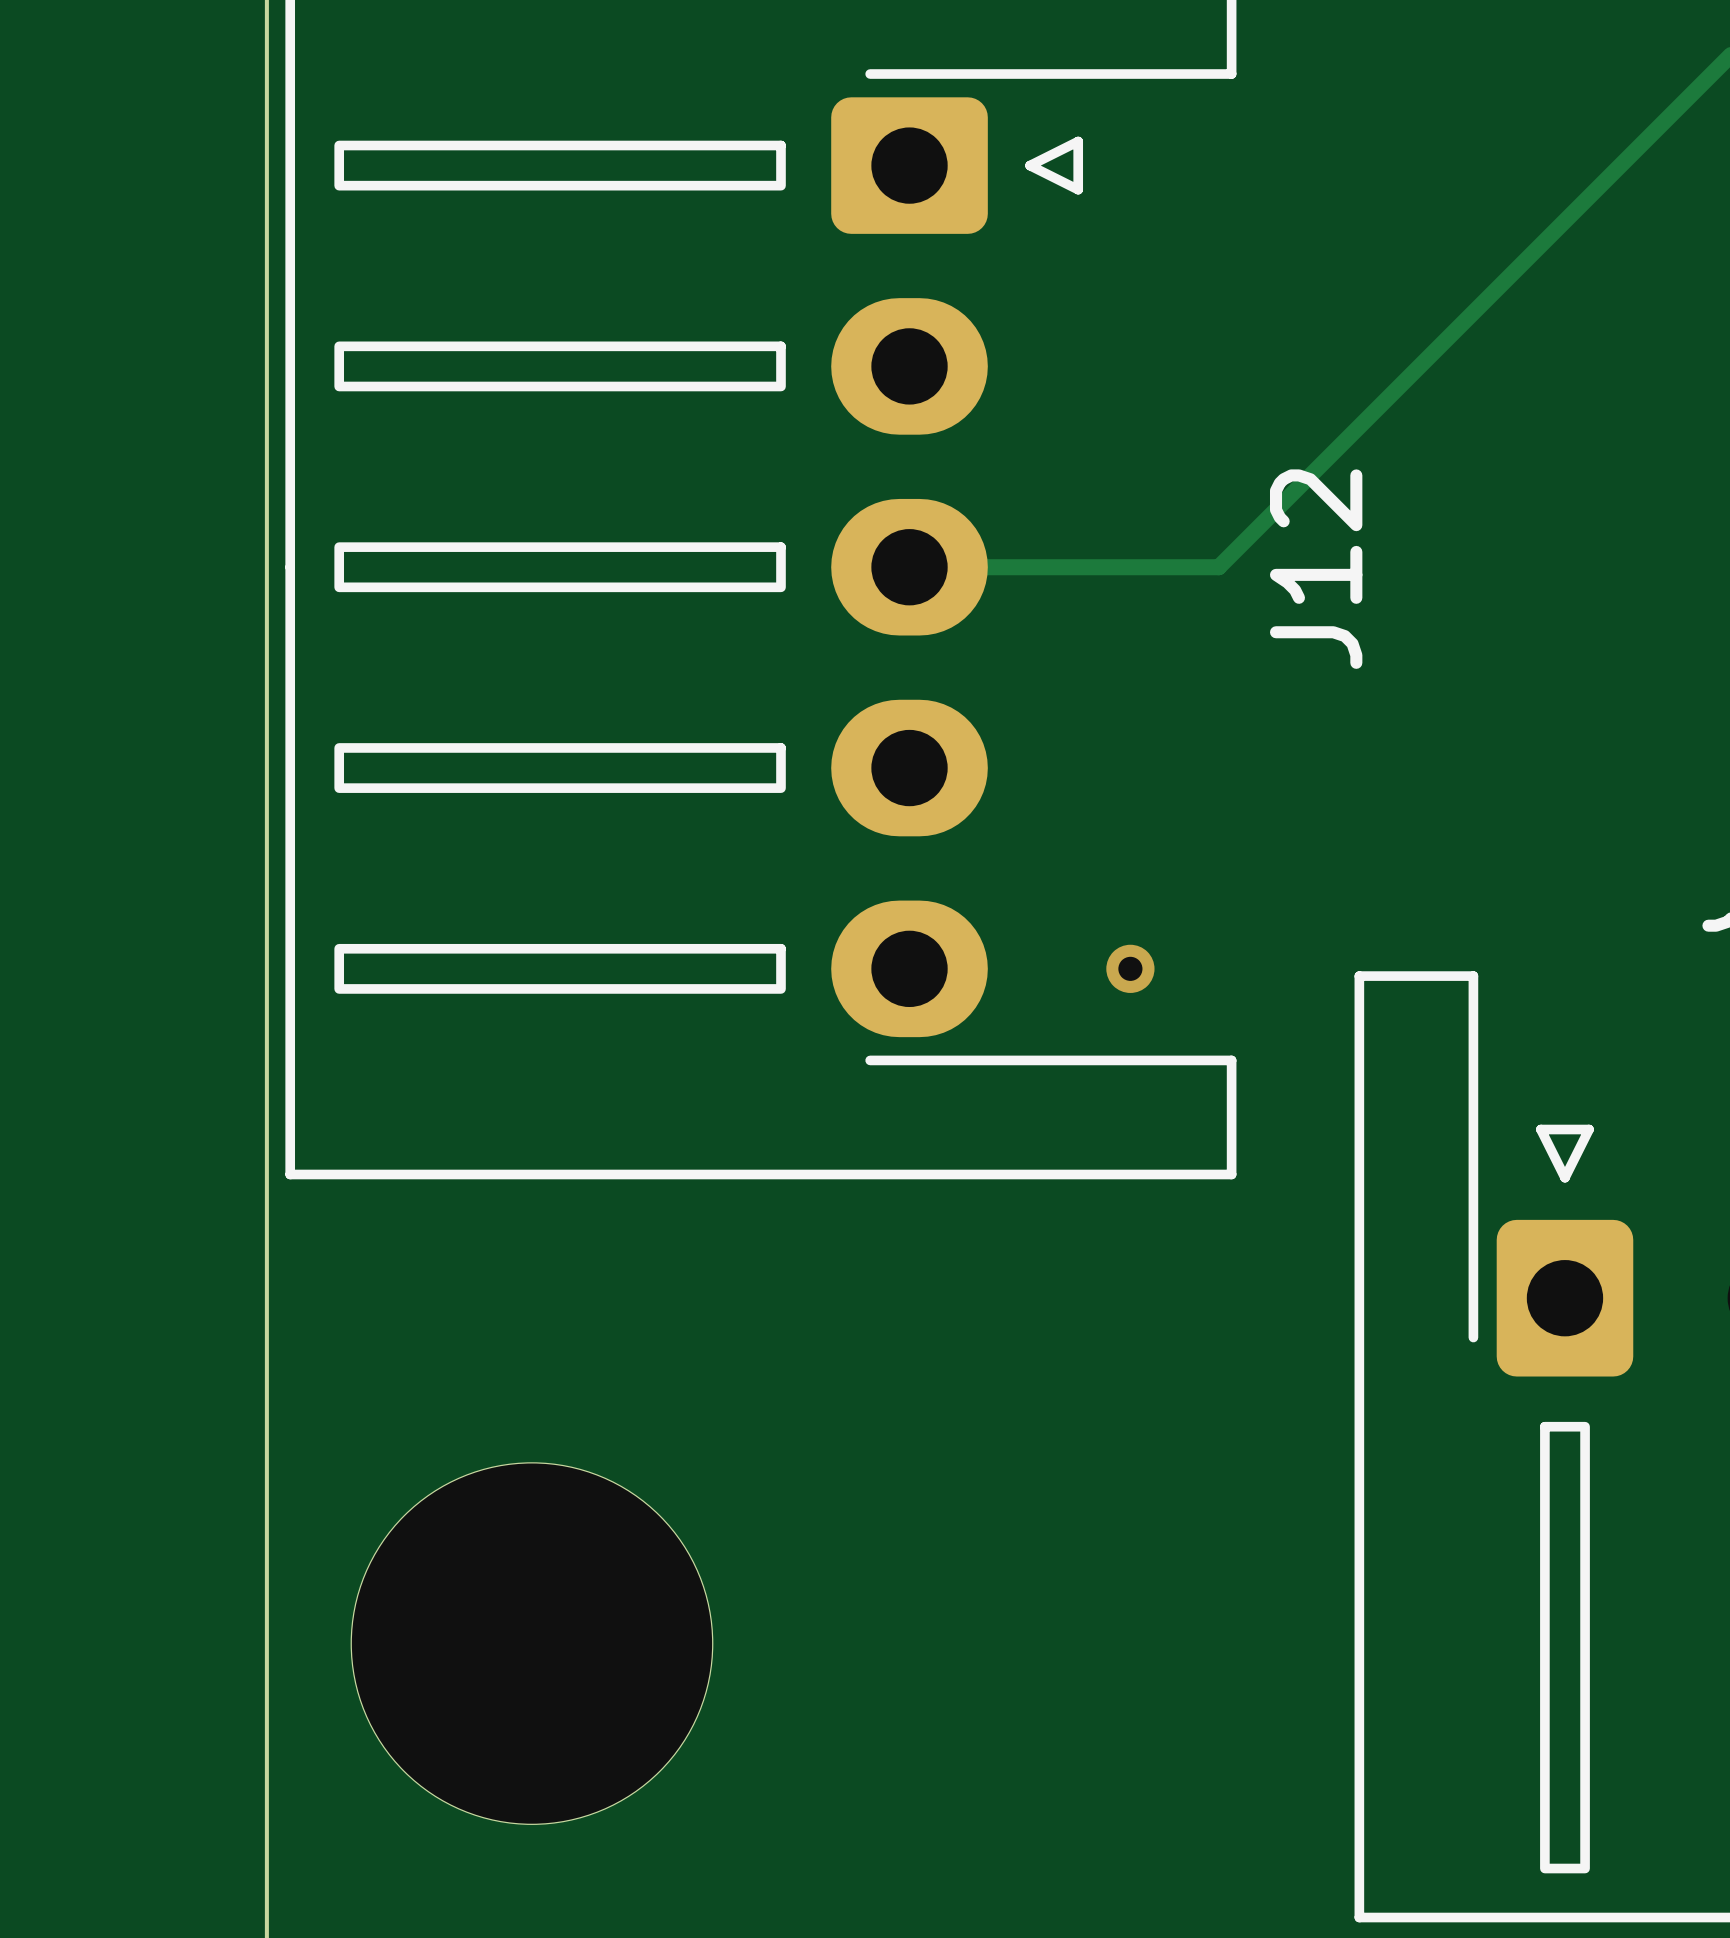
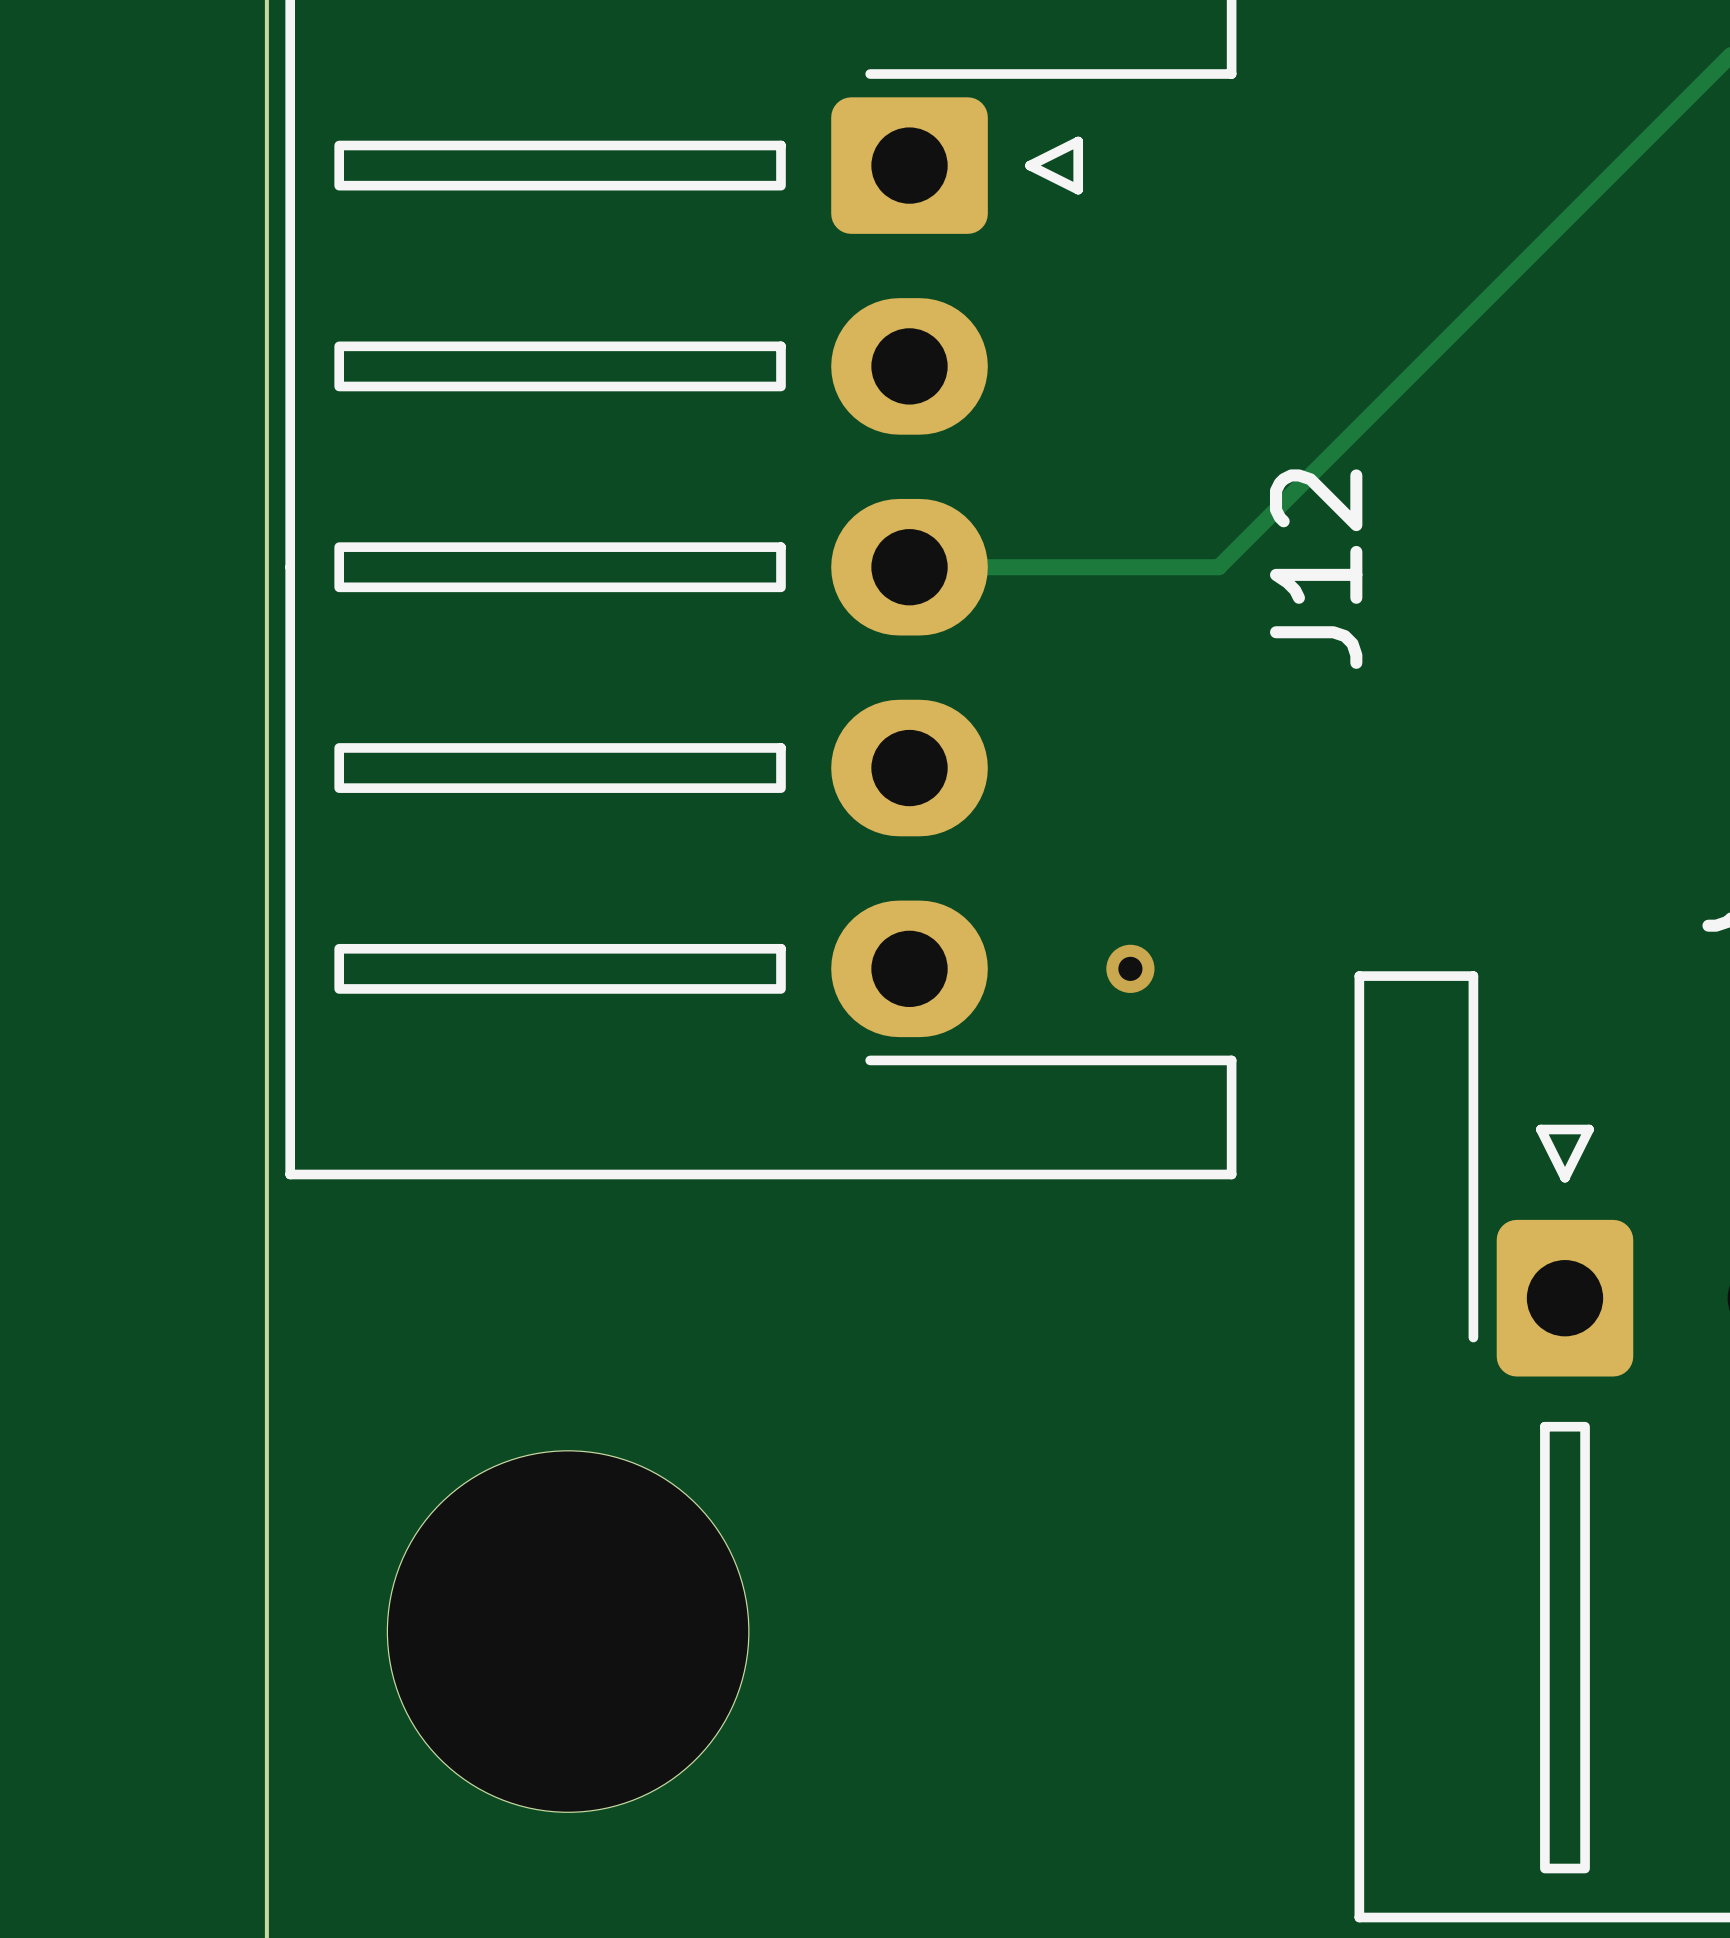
part position: (531, 1643) -> (568, 1631)

